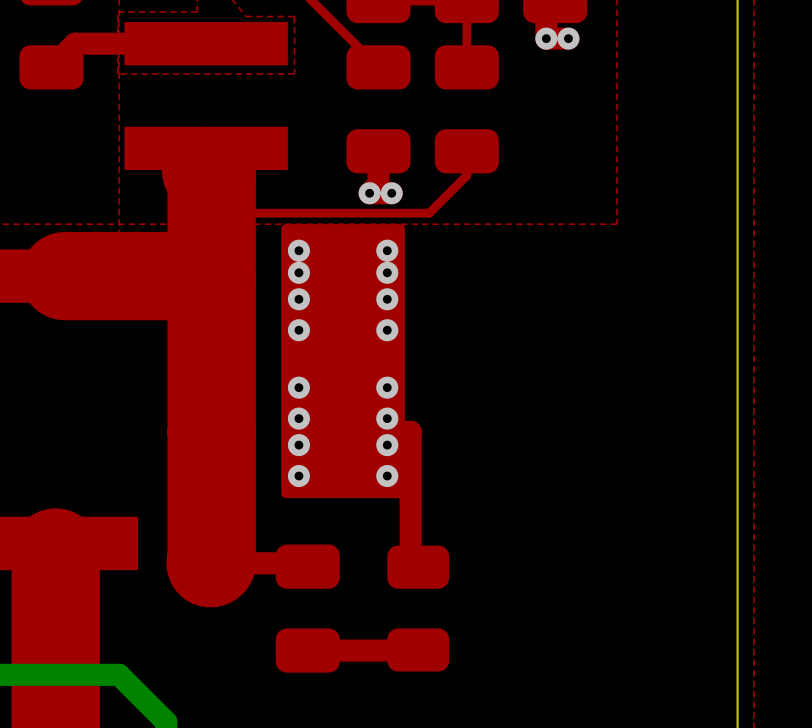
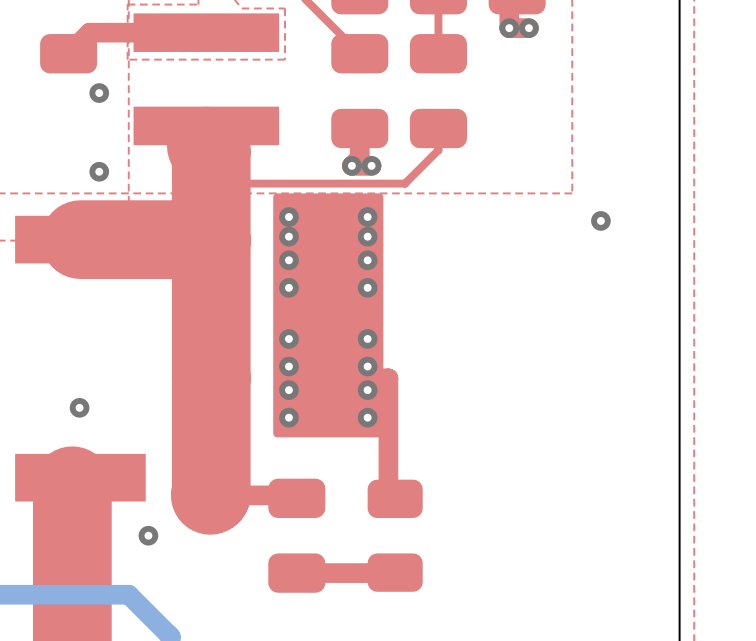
via: none -> (99, 93)
via: none -> (99, 171)
via: none -> (600, 220)
via: none -> (79, 407)
via: none -> (148, 535)

